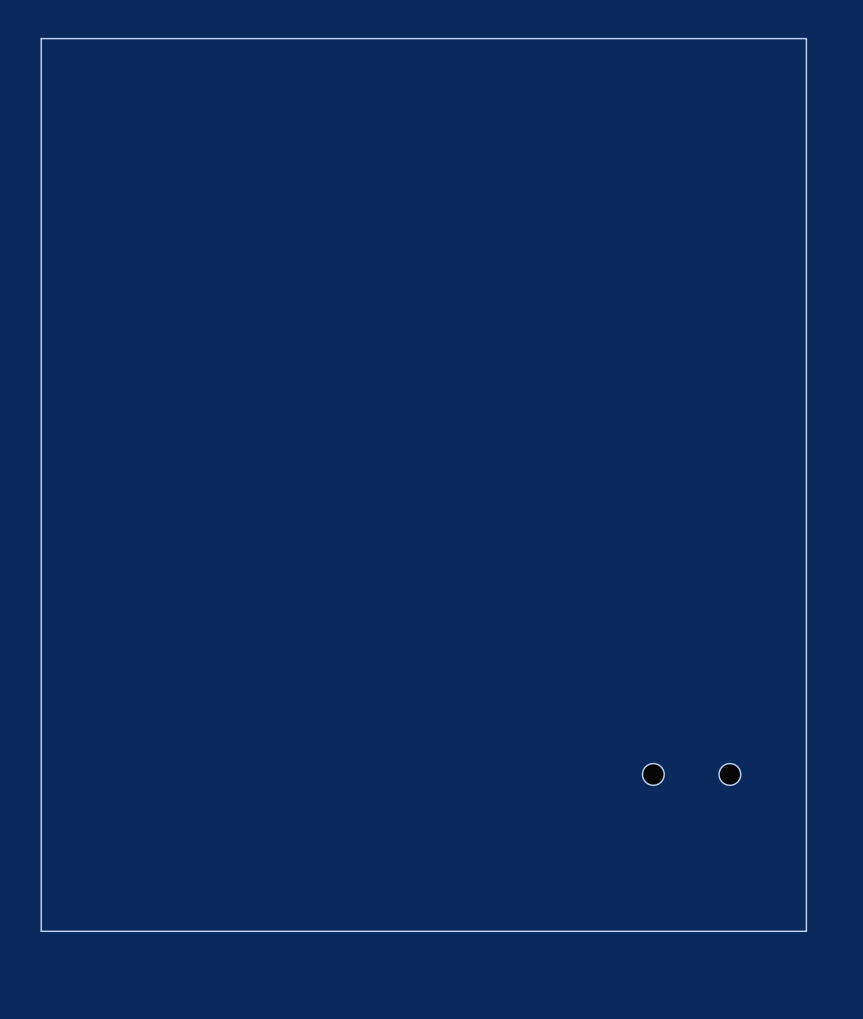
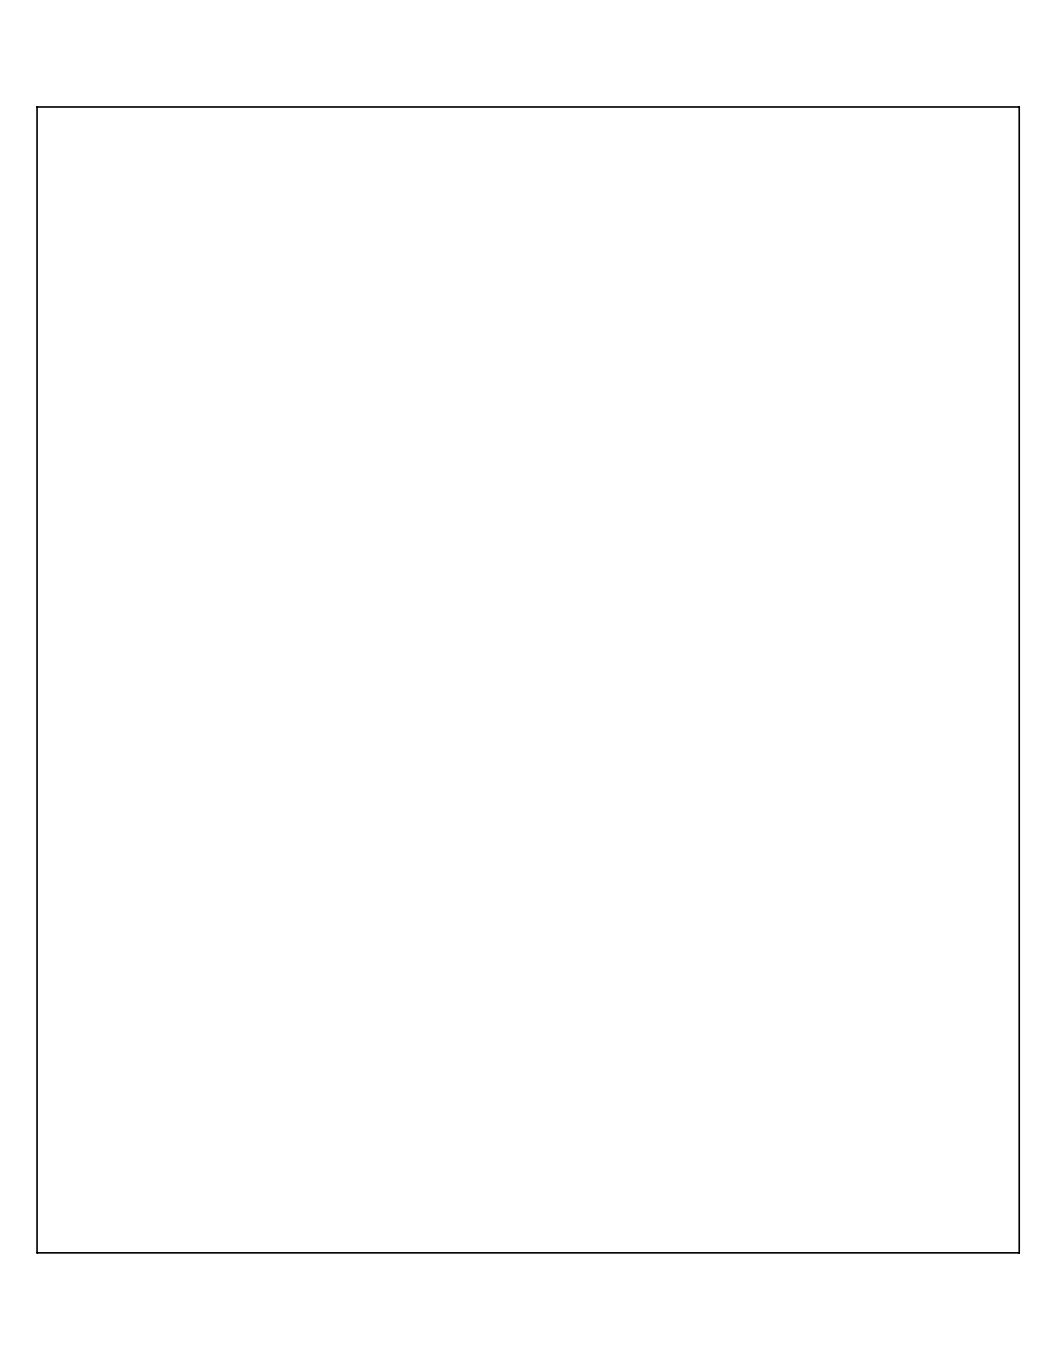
part: (691, 774) -> none

